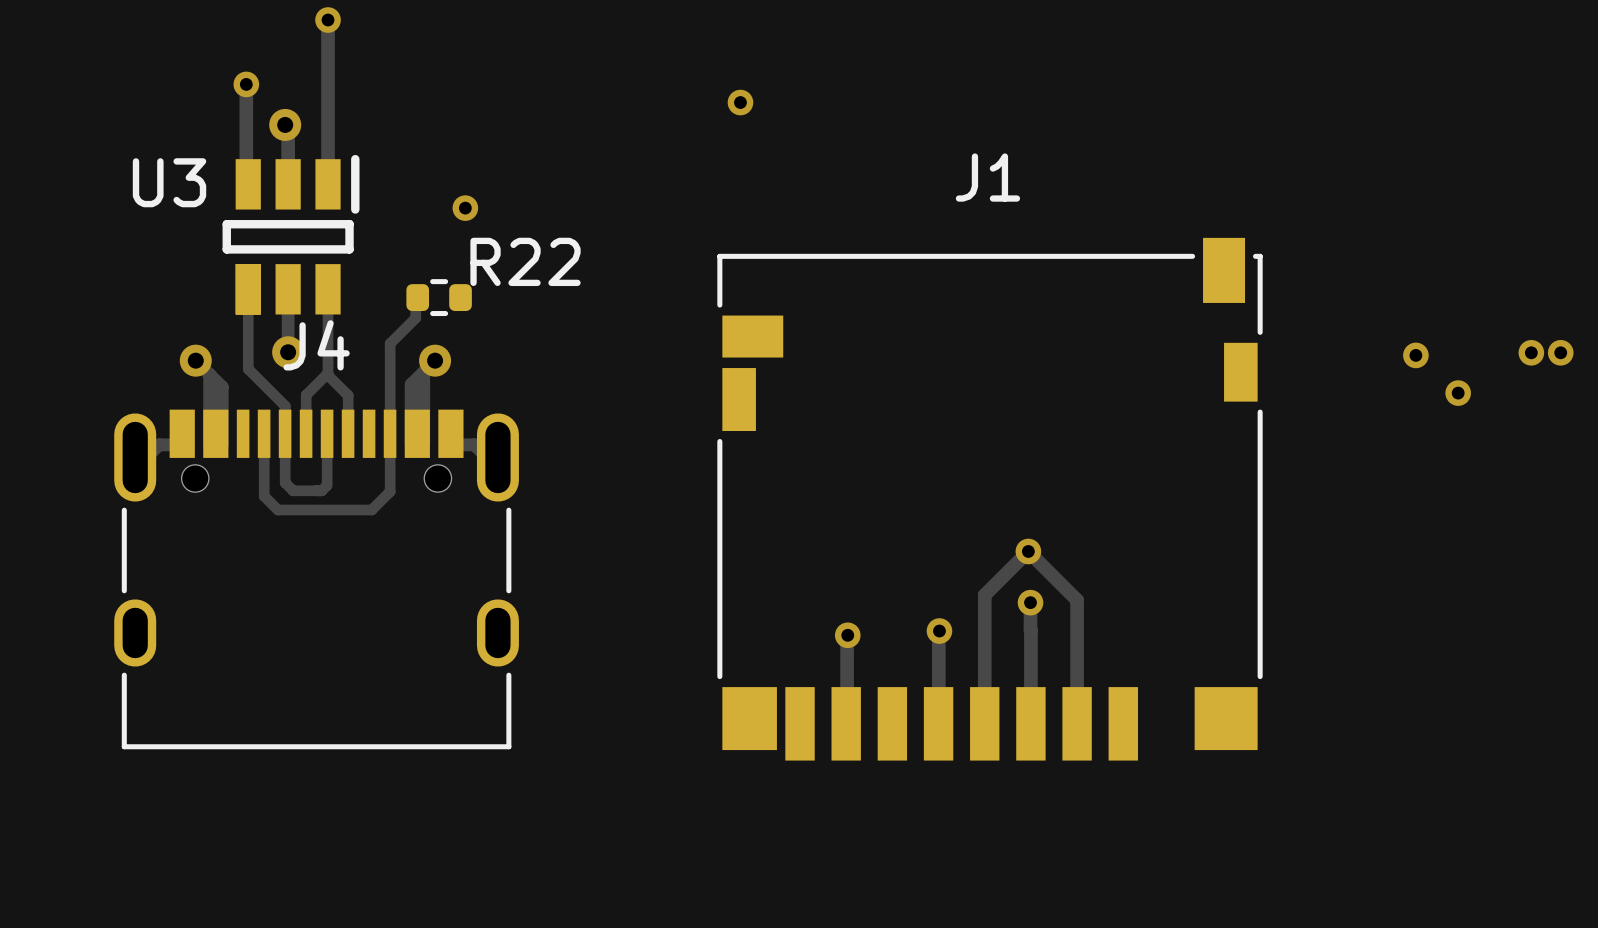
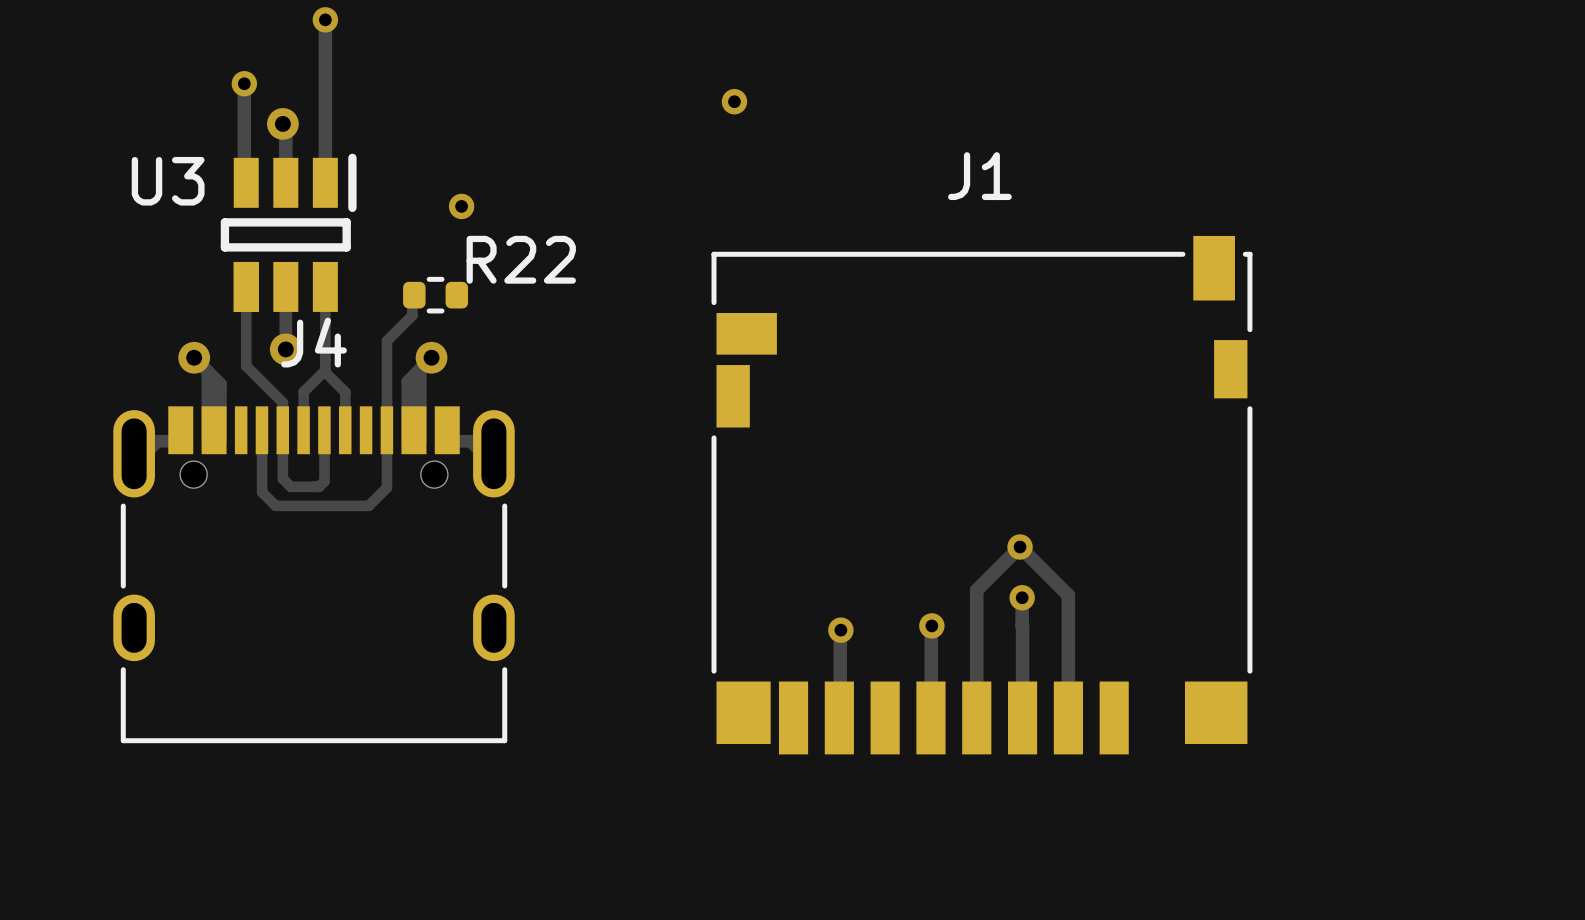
via: (1531, 352) -> none
via: (1560, 352) -> none
via: (1415, 355) -> none
via: (1458, 393) -> none

